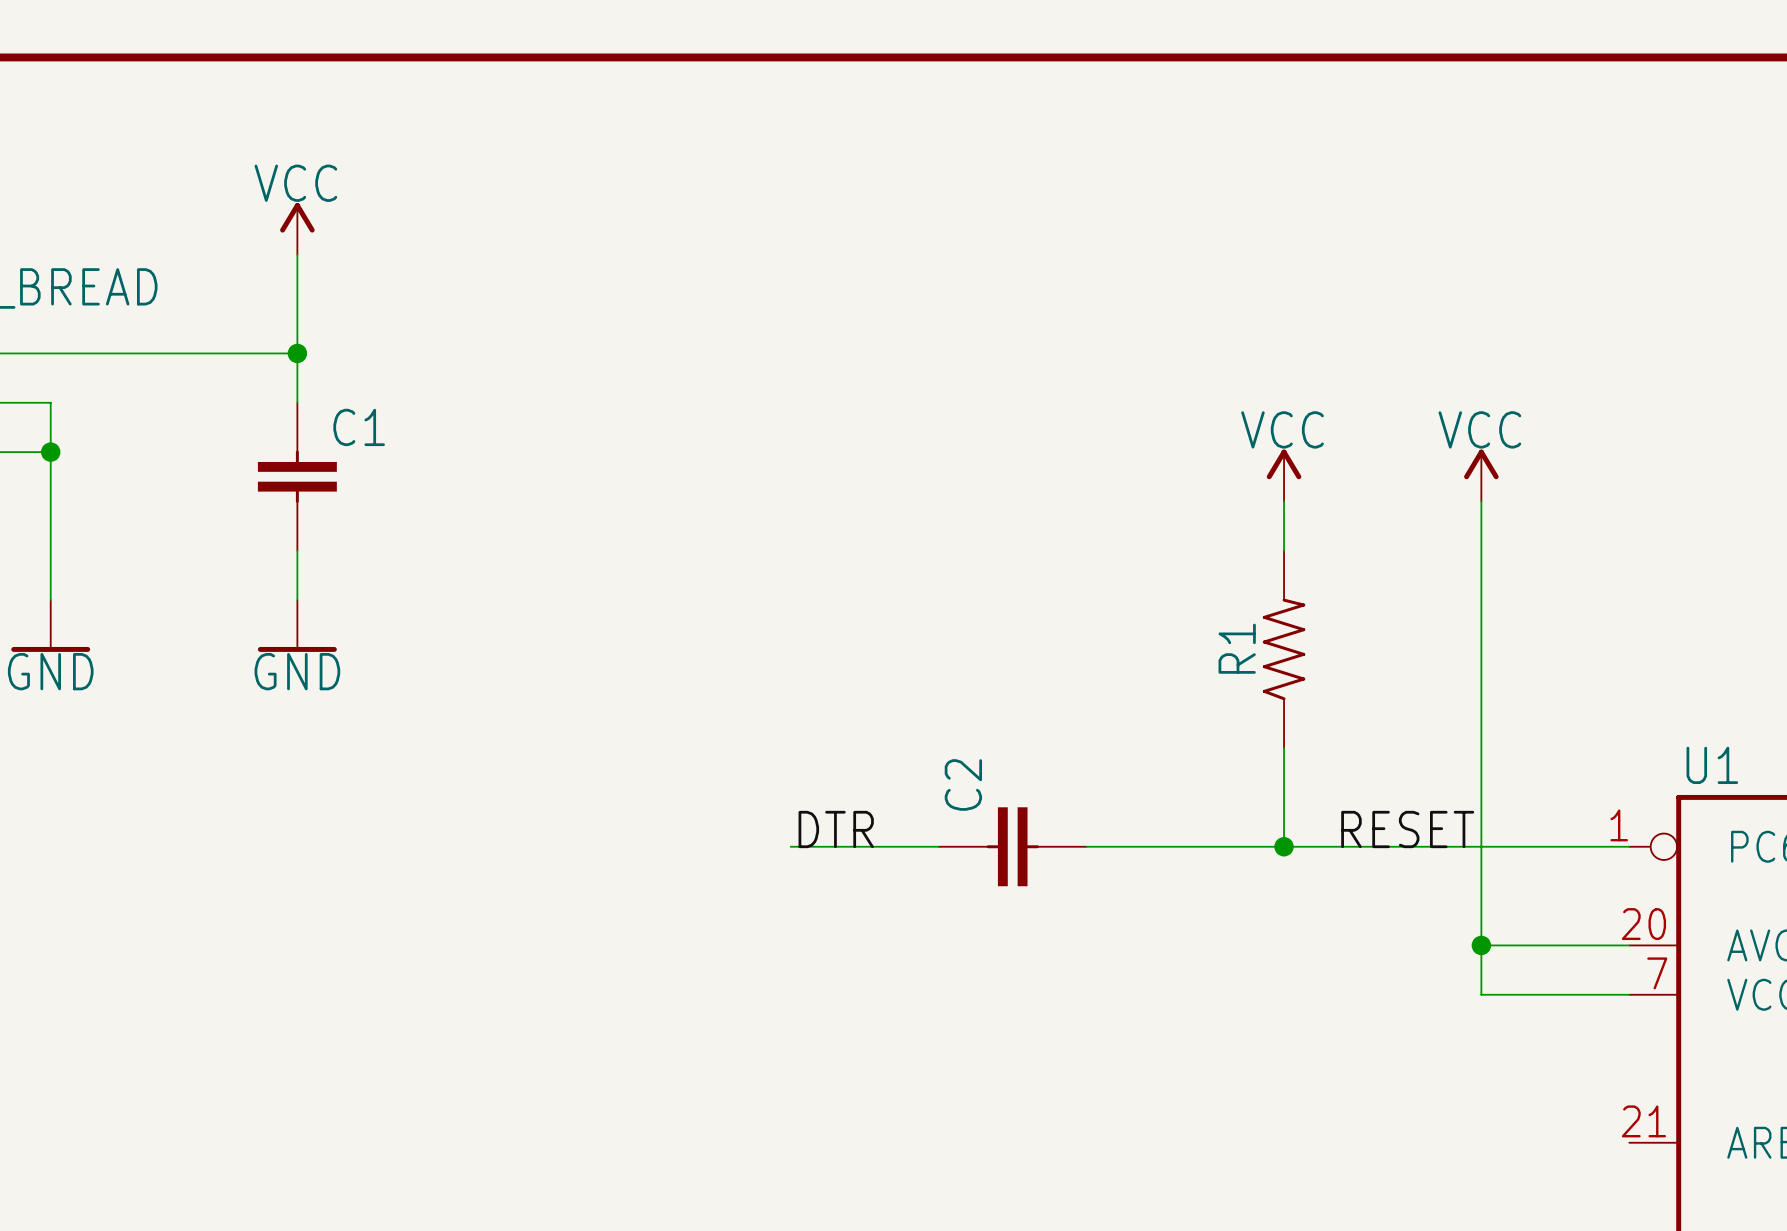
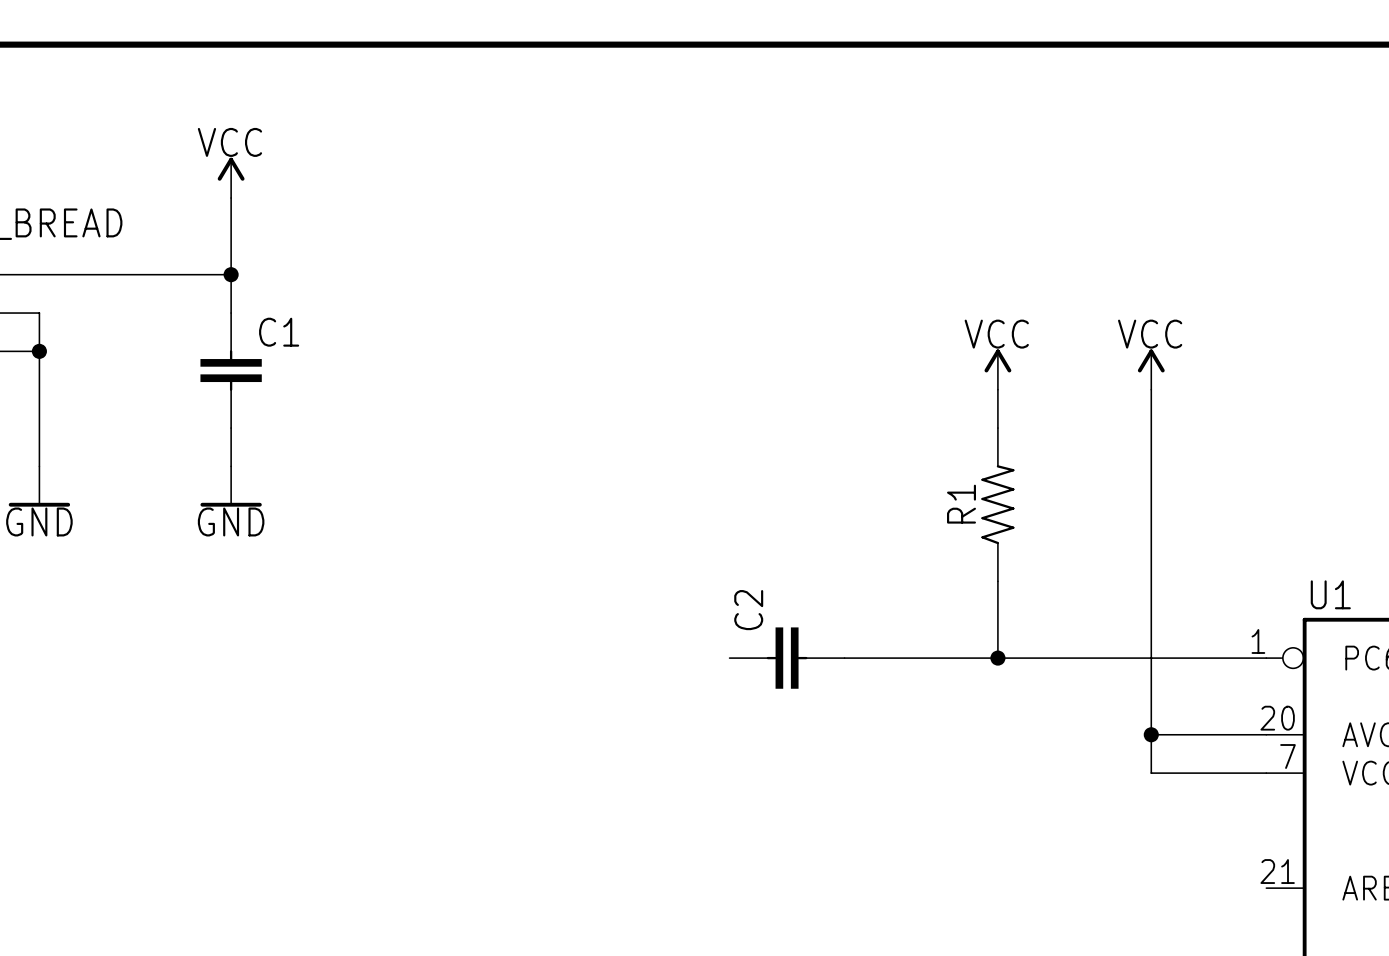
label: DTR (836, 829) -> none
label: RESET (1407, 829) -> none
wire: (790, 846) (938, 846) -> none

